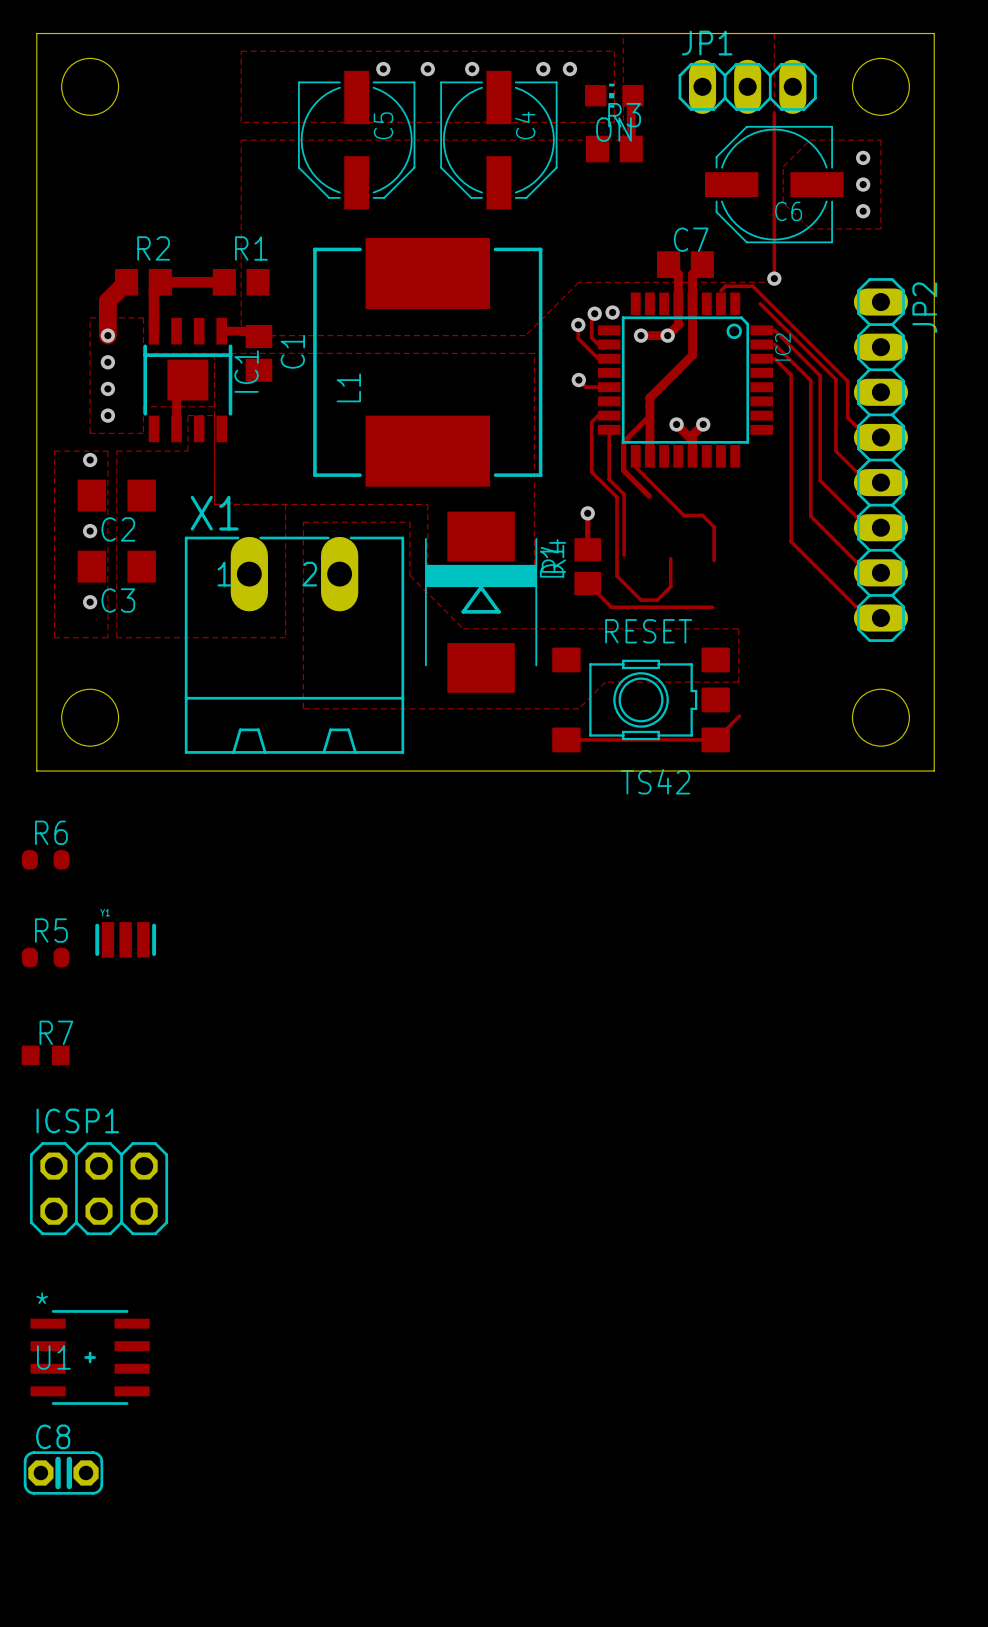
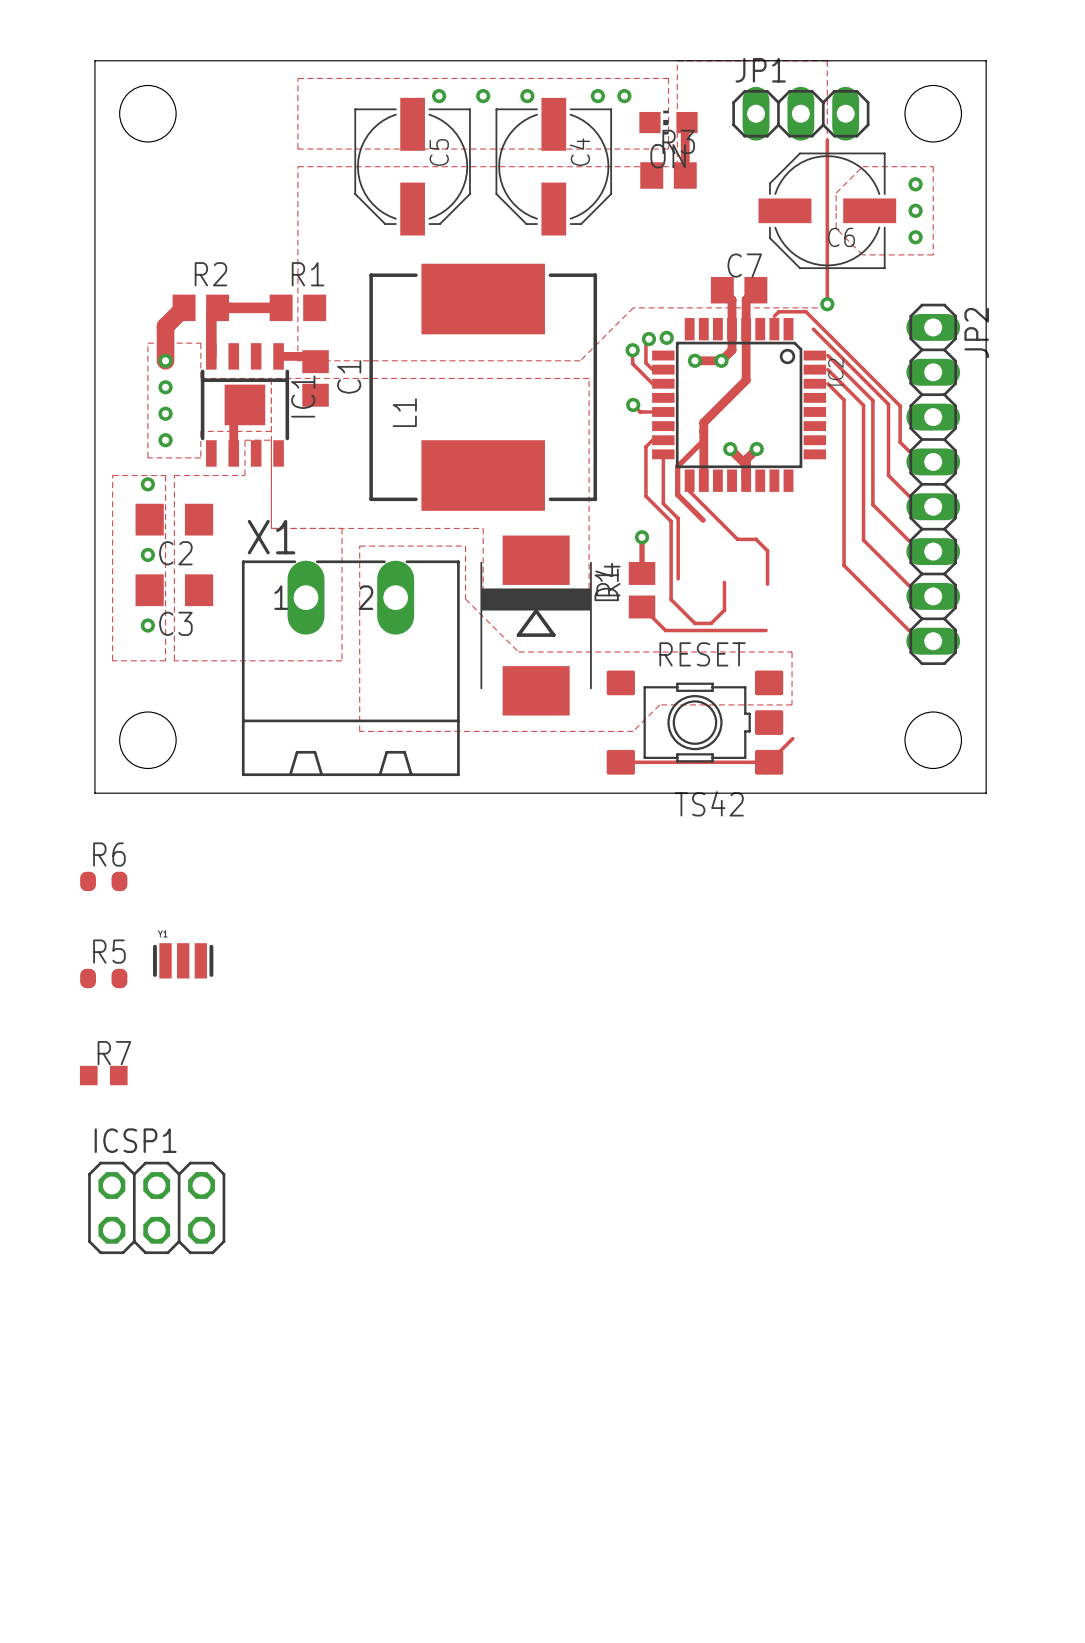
U1: (90, 1357) -> none
C8: (63, 1472) -> none

